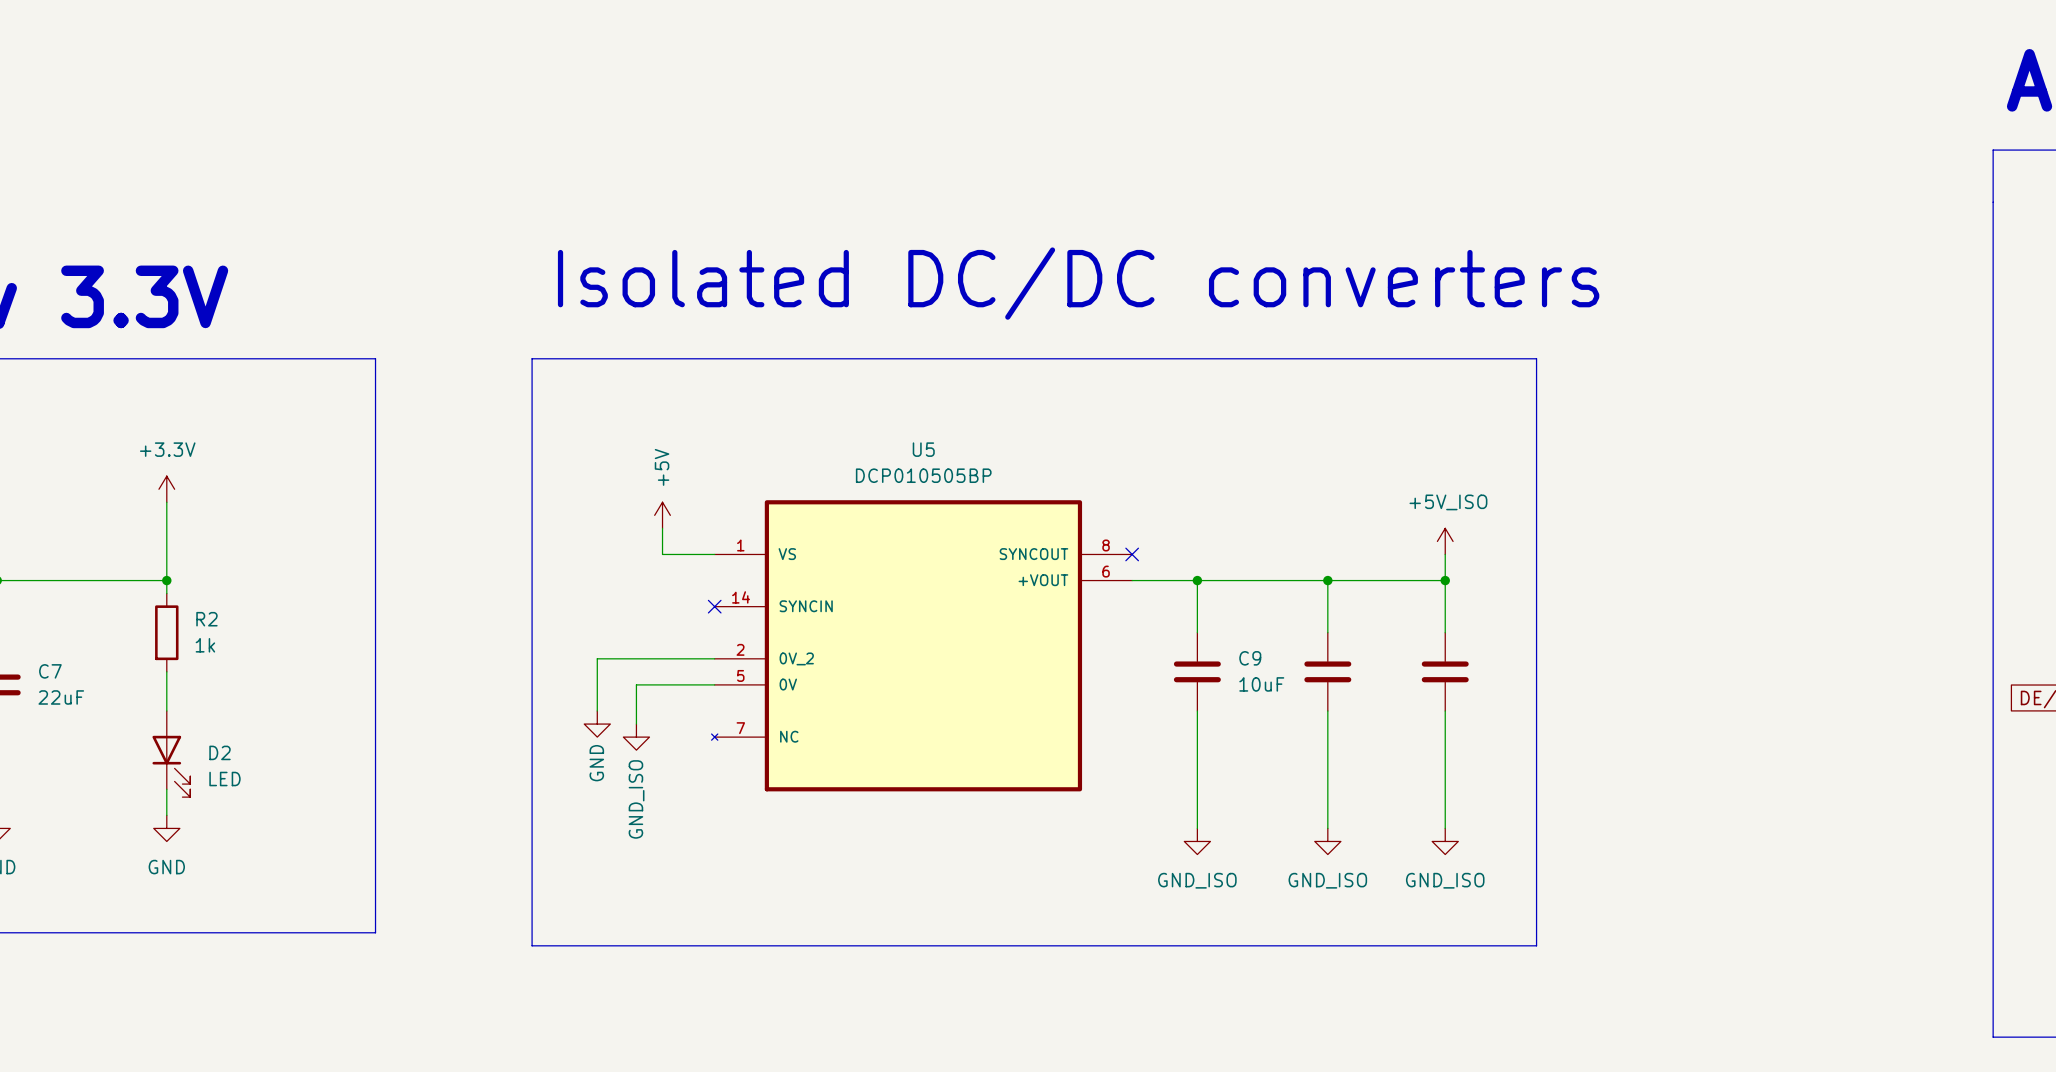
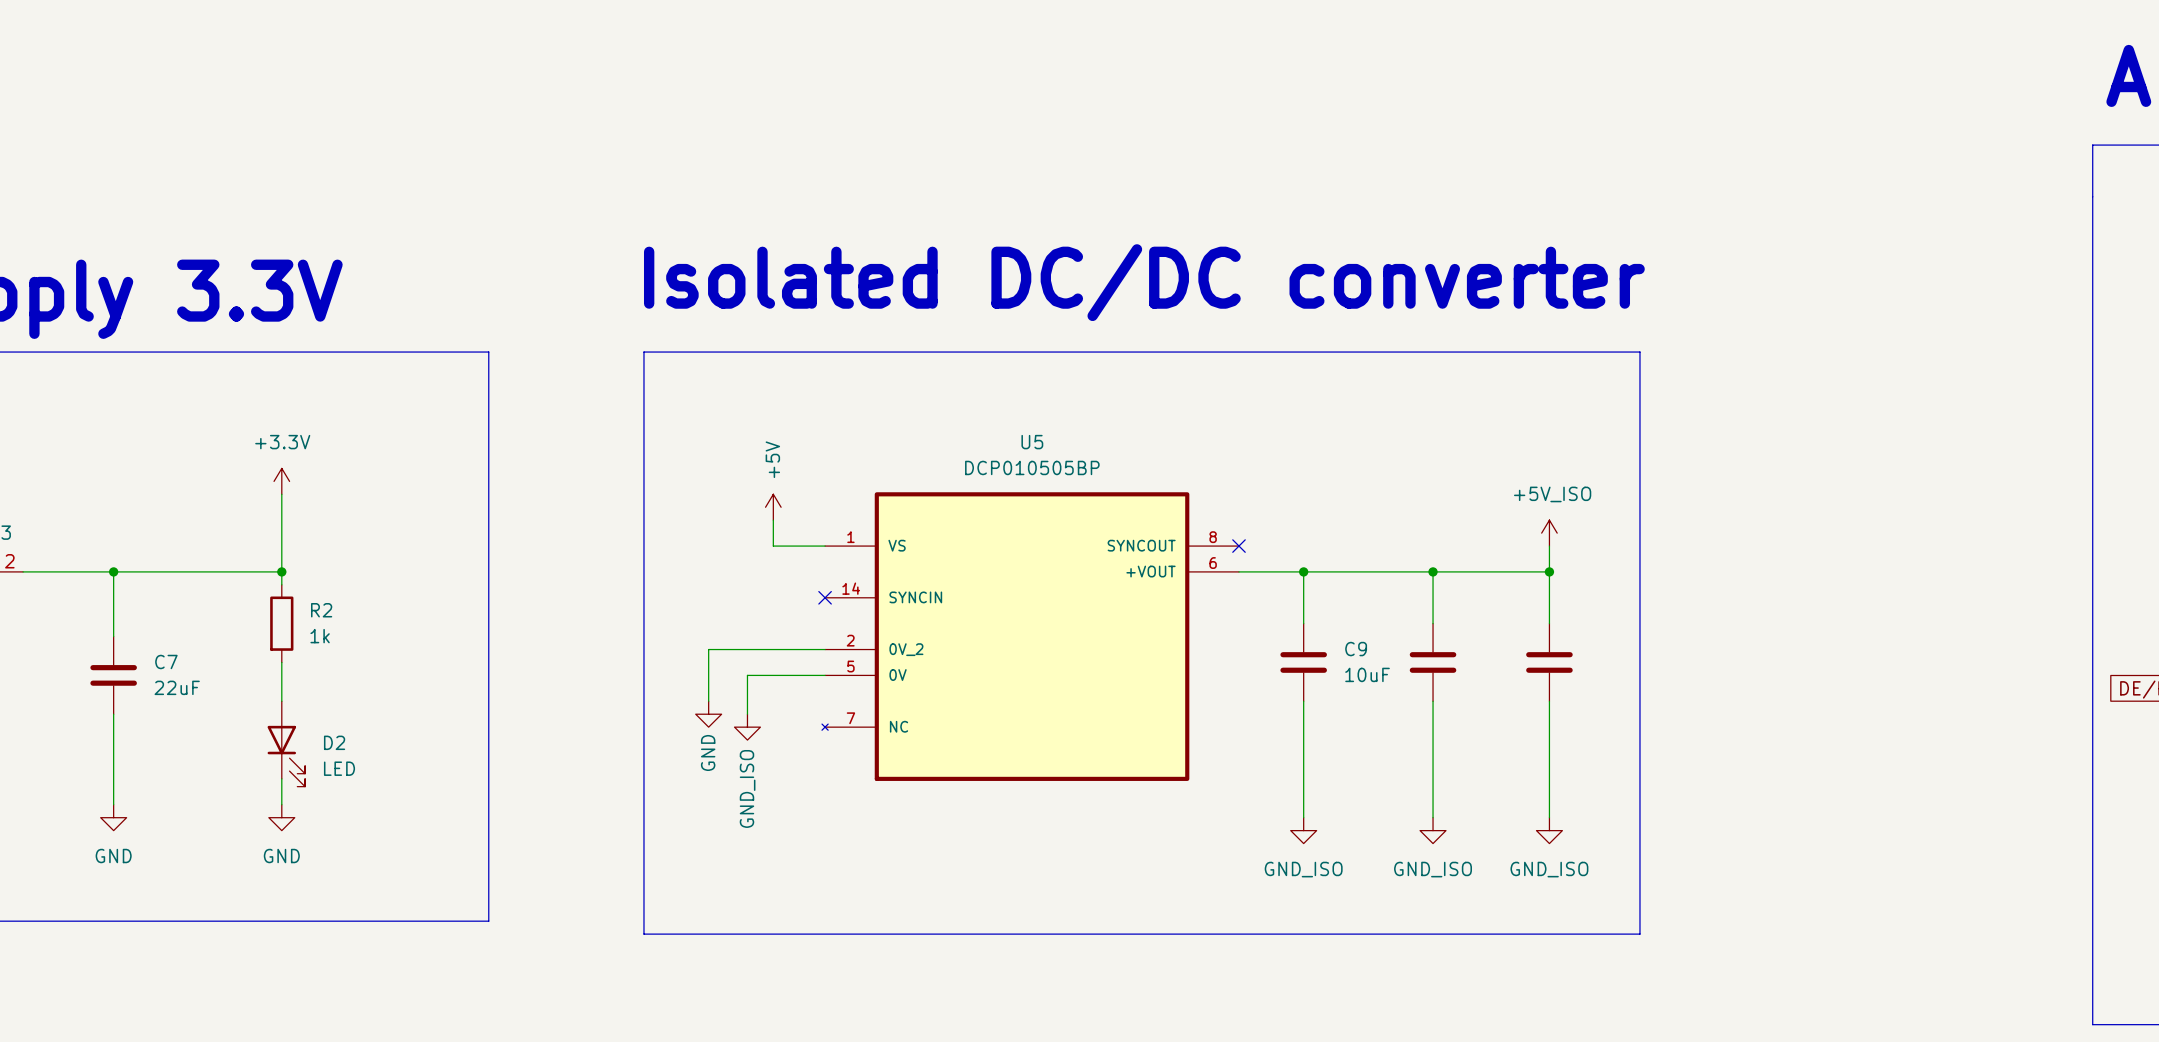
text: Isolated DC/DC converters (1078, 283) -> Isolated DC/DC converter (1144, 282)

